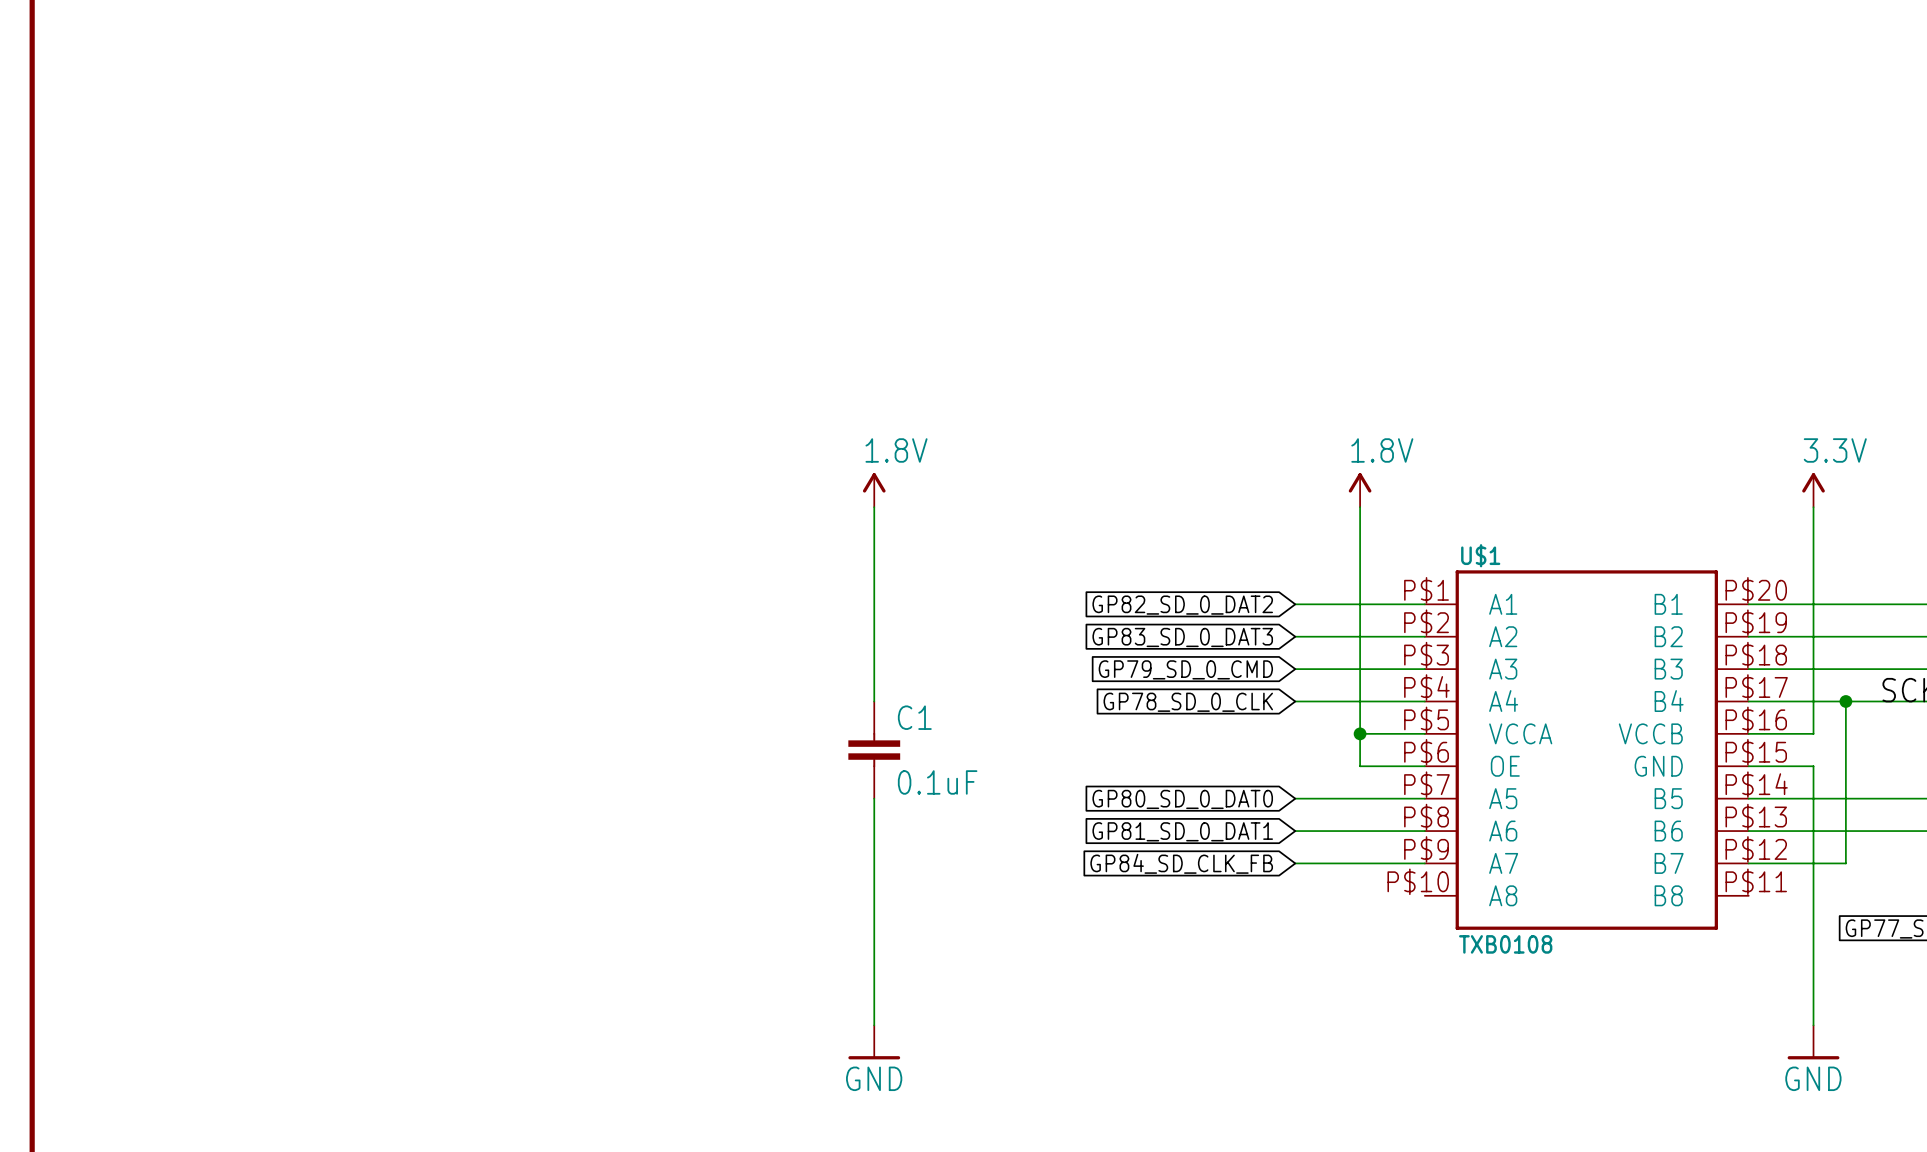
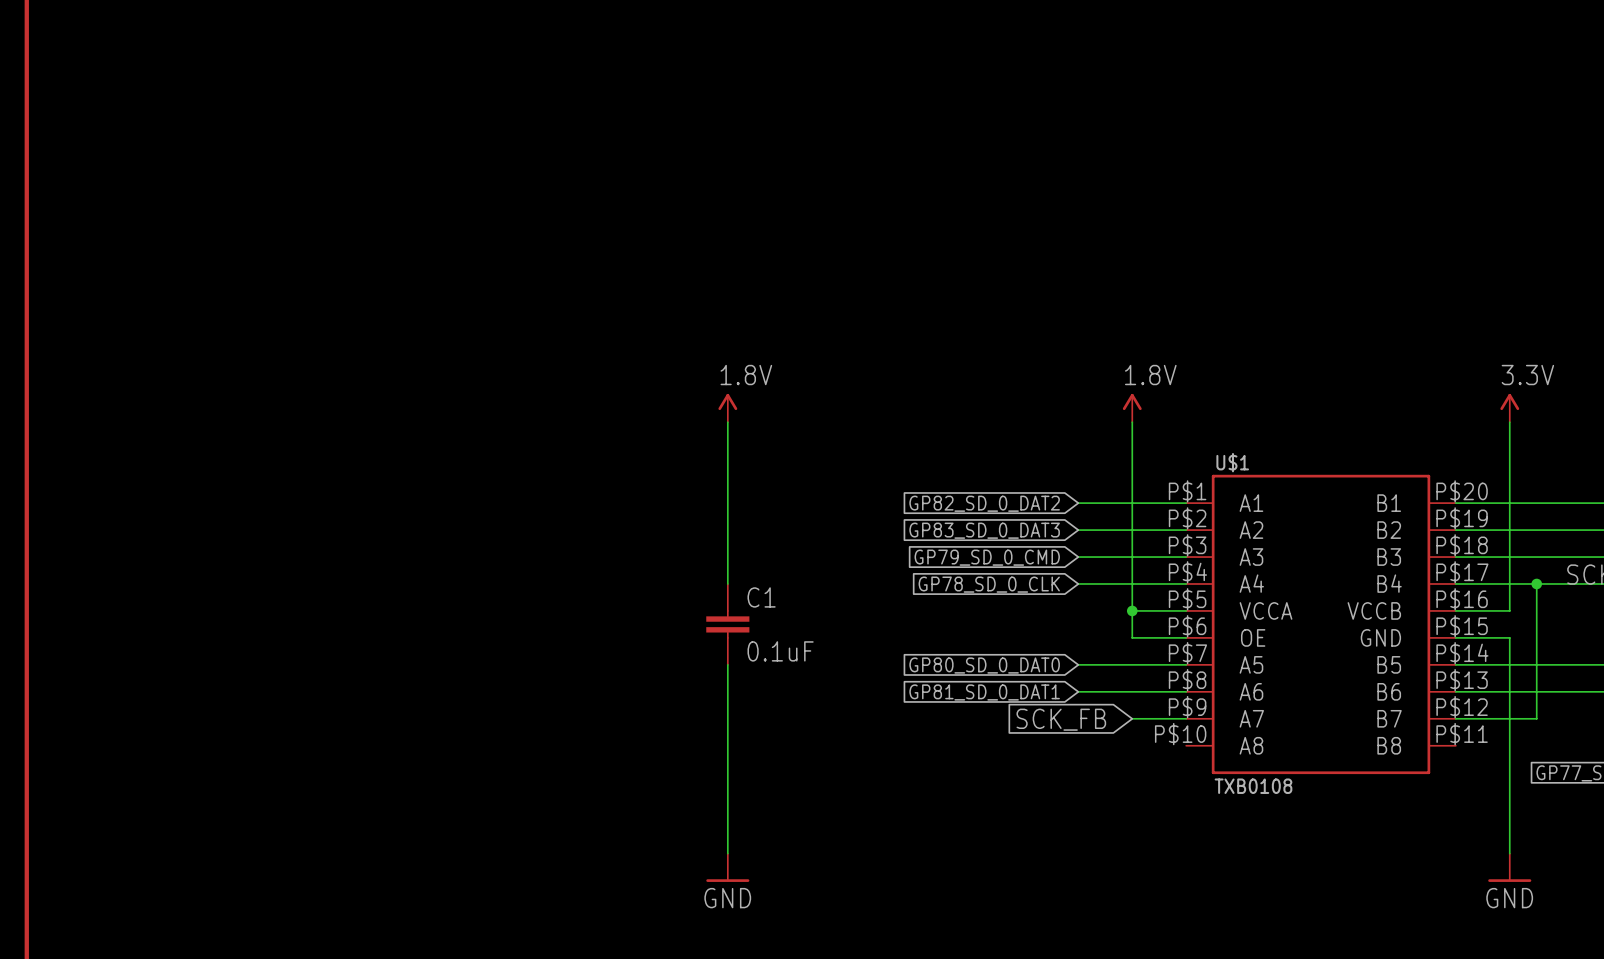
global label: GP84_SD_CLK_FB (1181, 863) -> none
wire: (1295, 863) (1360, 863) -> none
global label: none -> SCK_FB (1061, 719)

